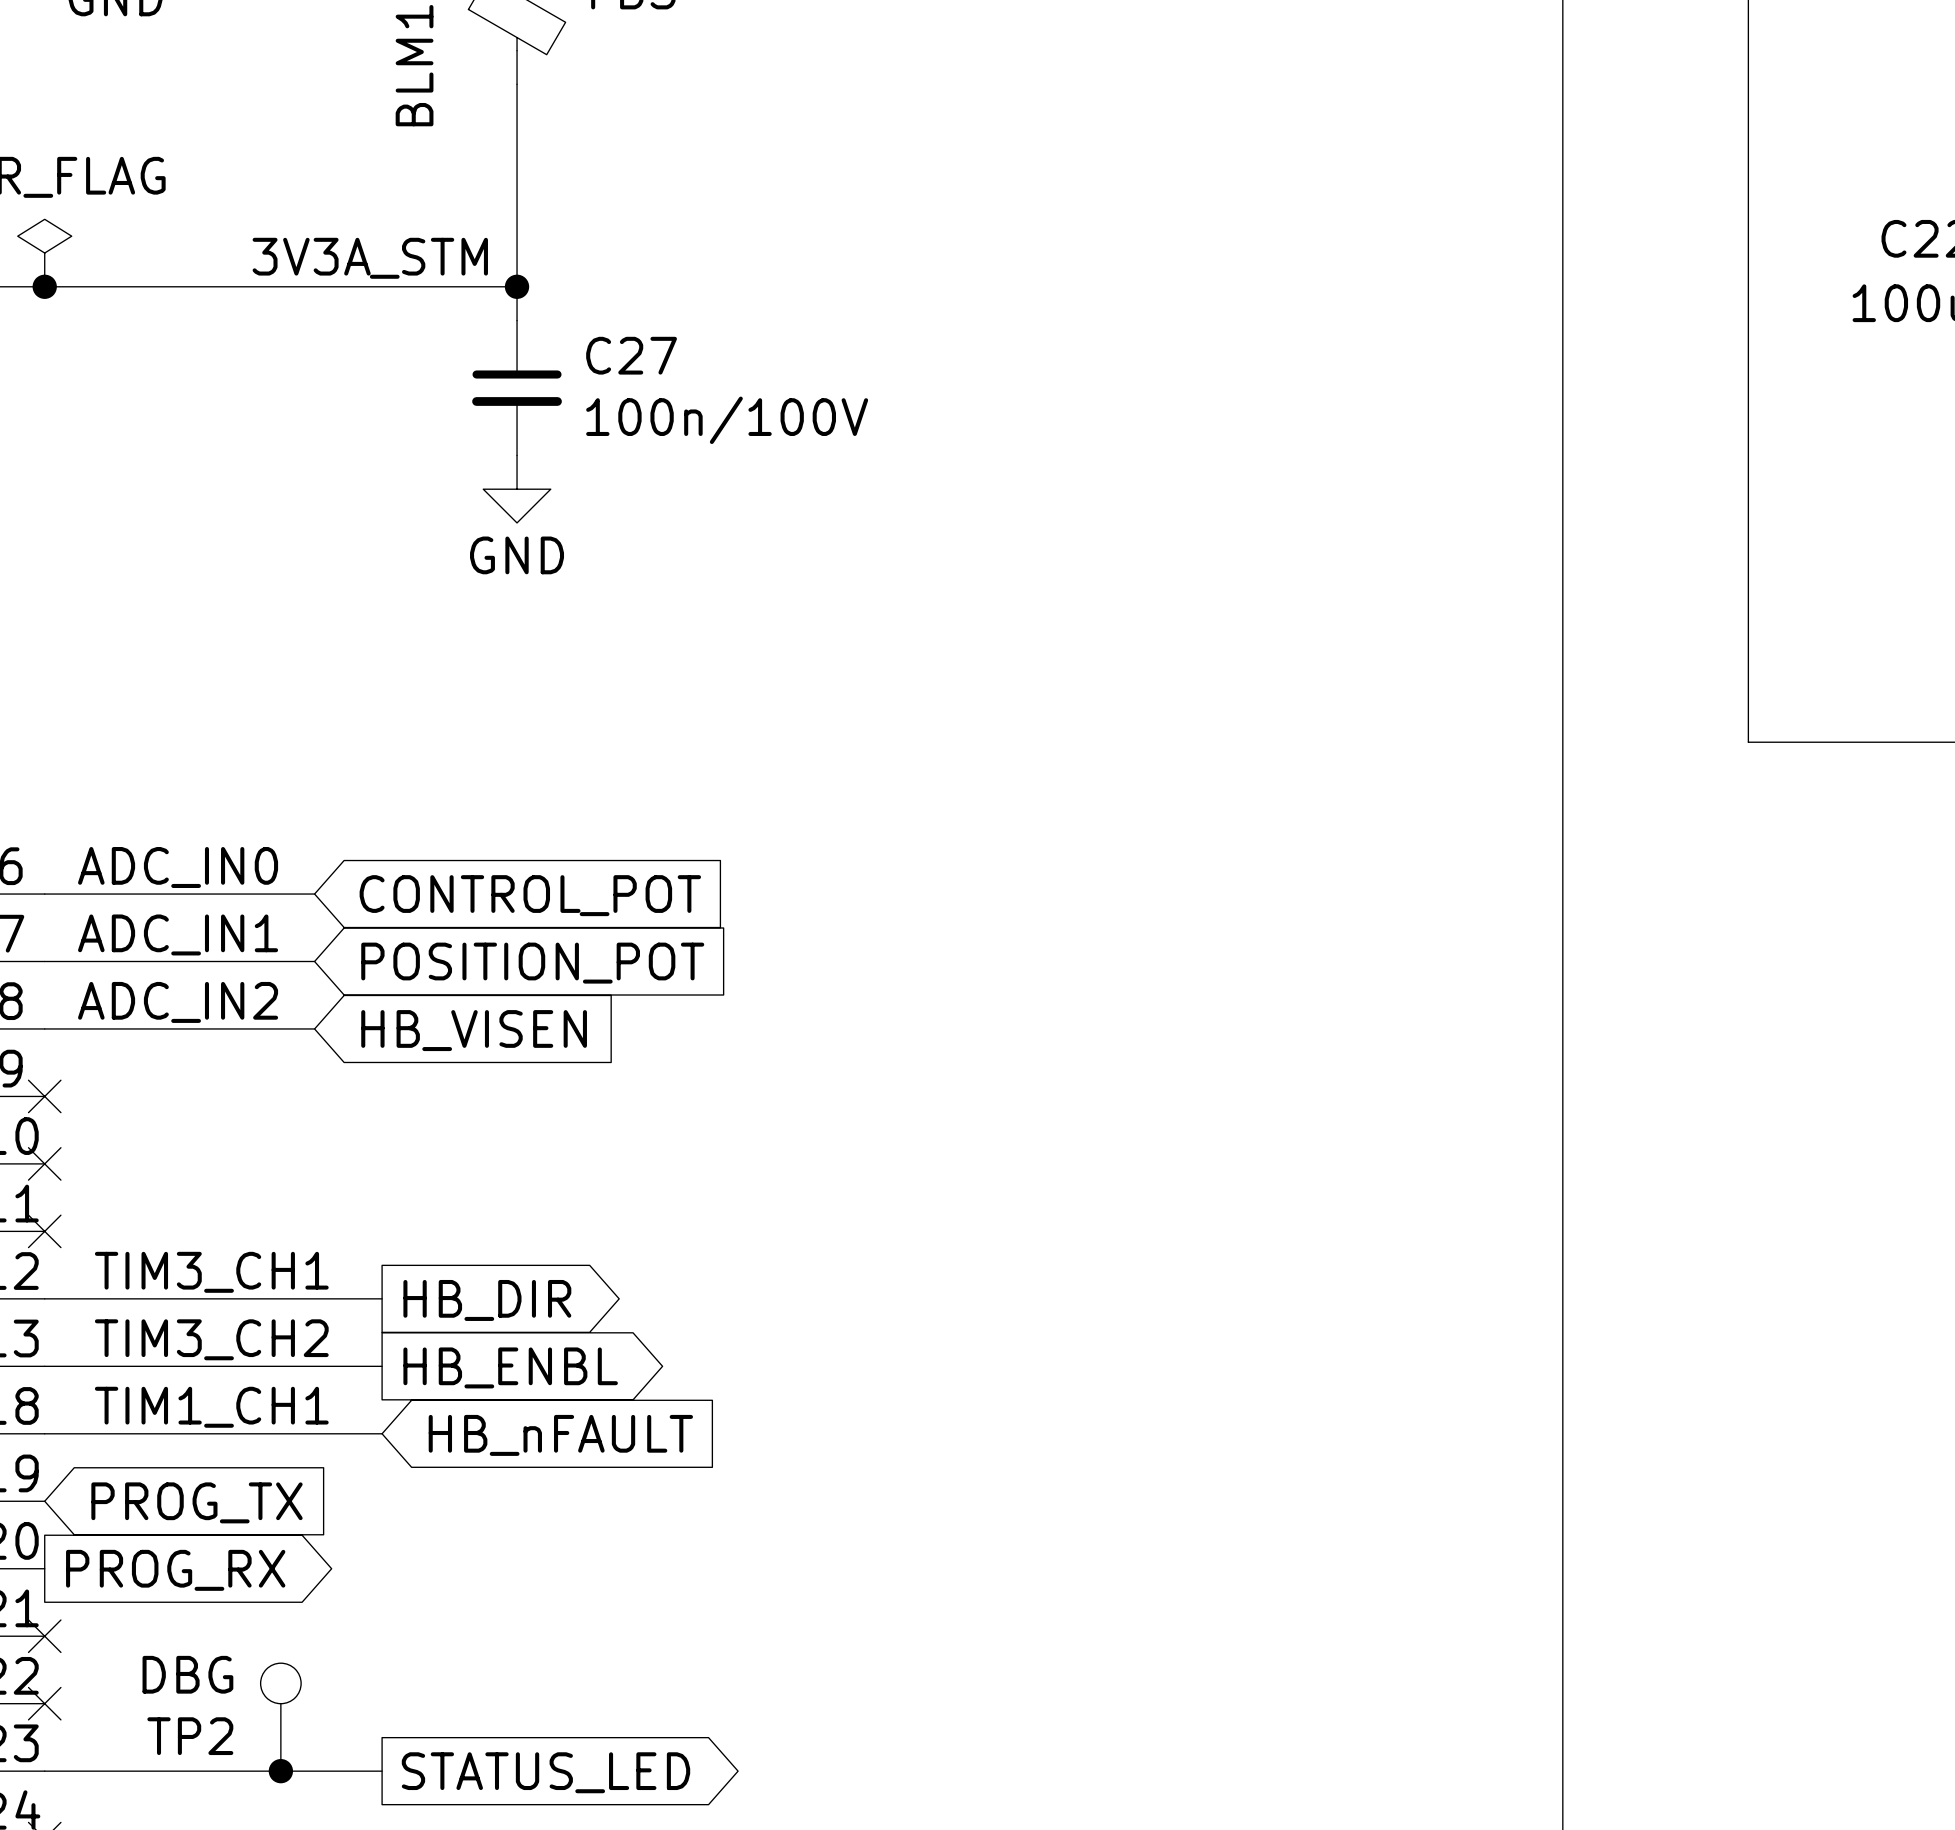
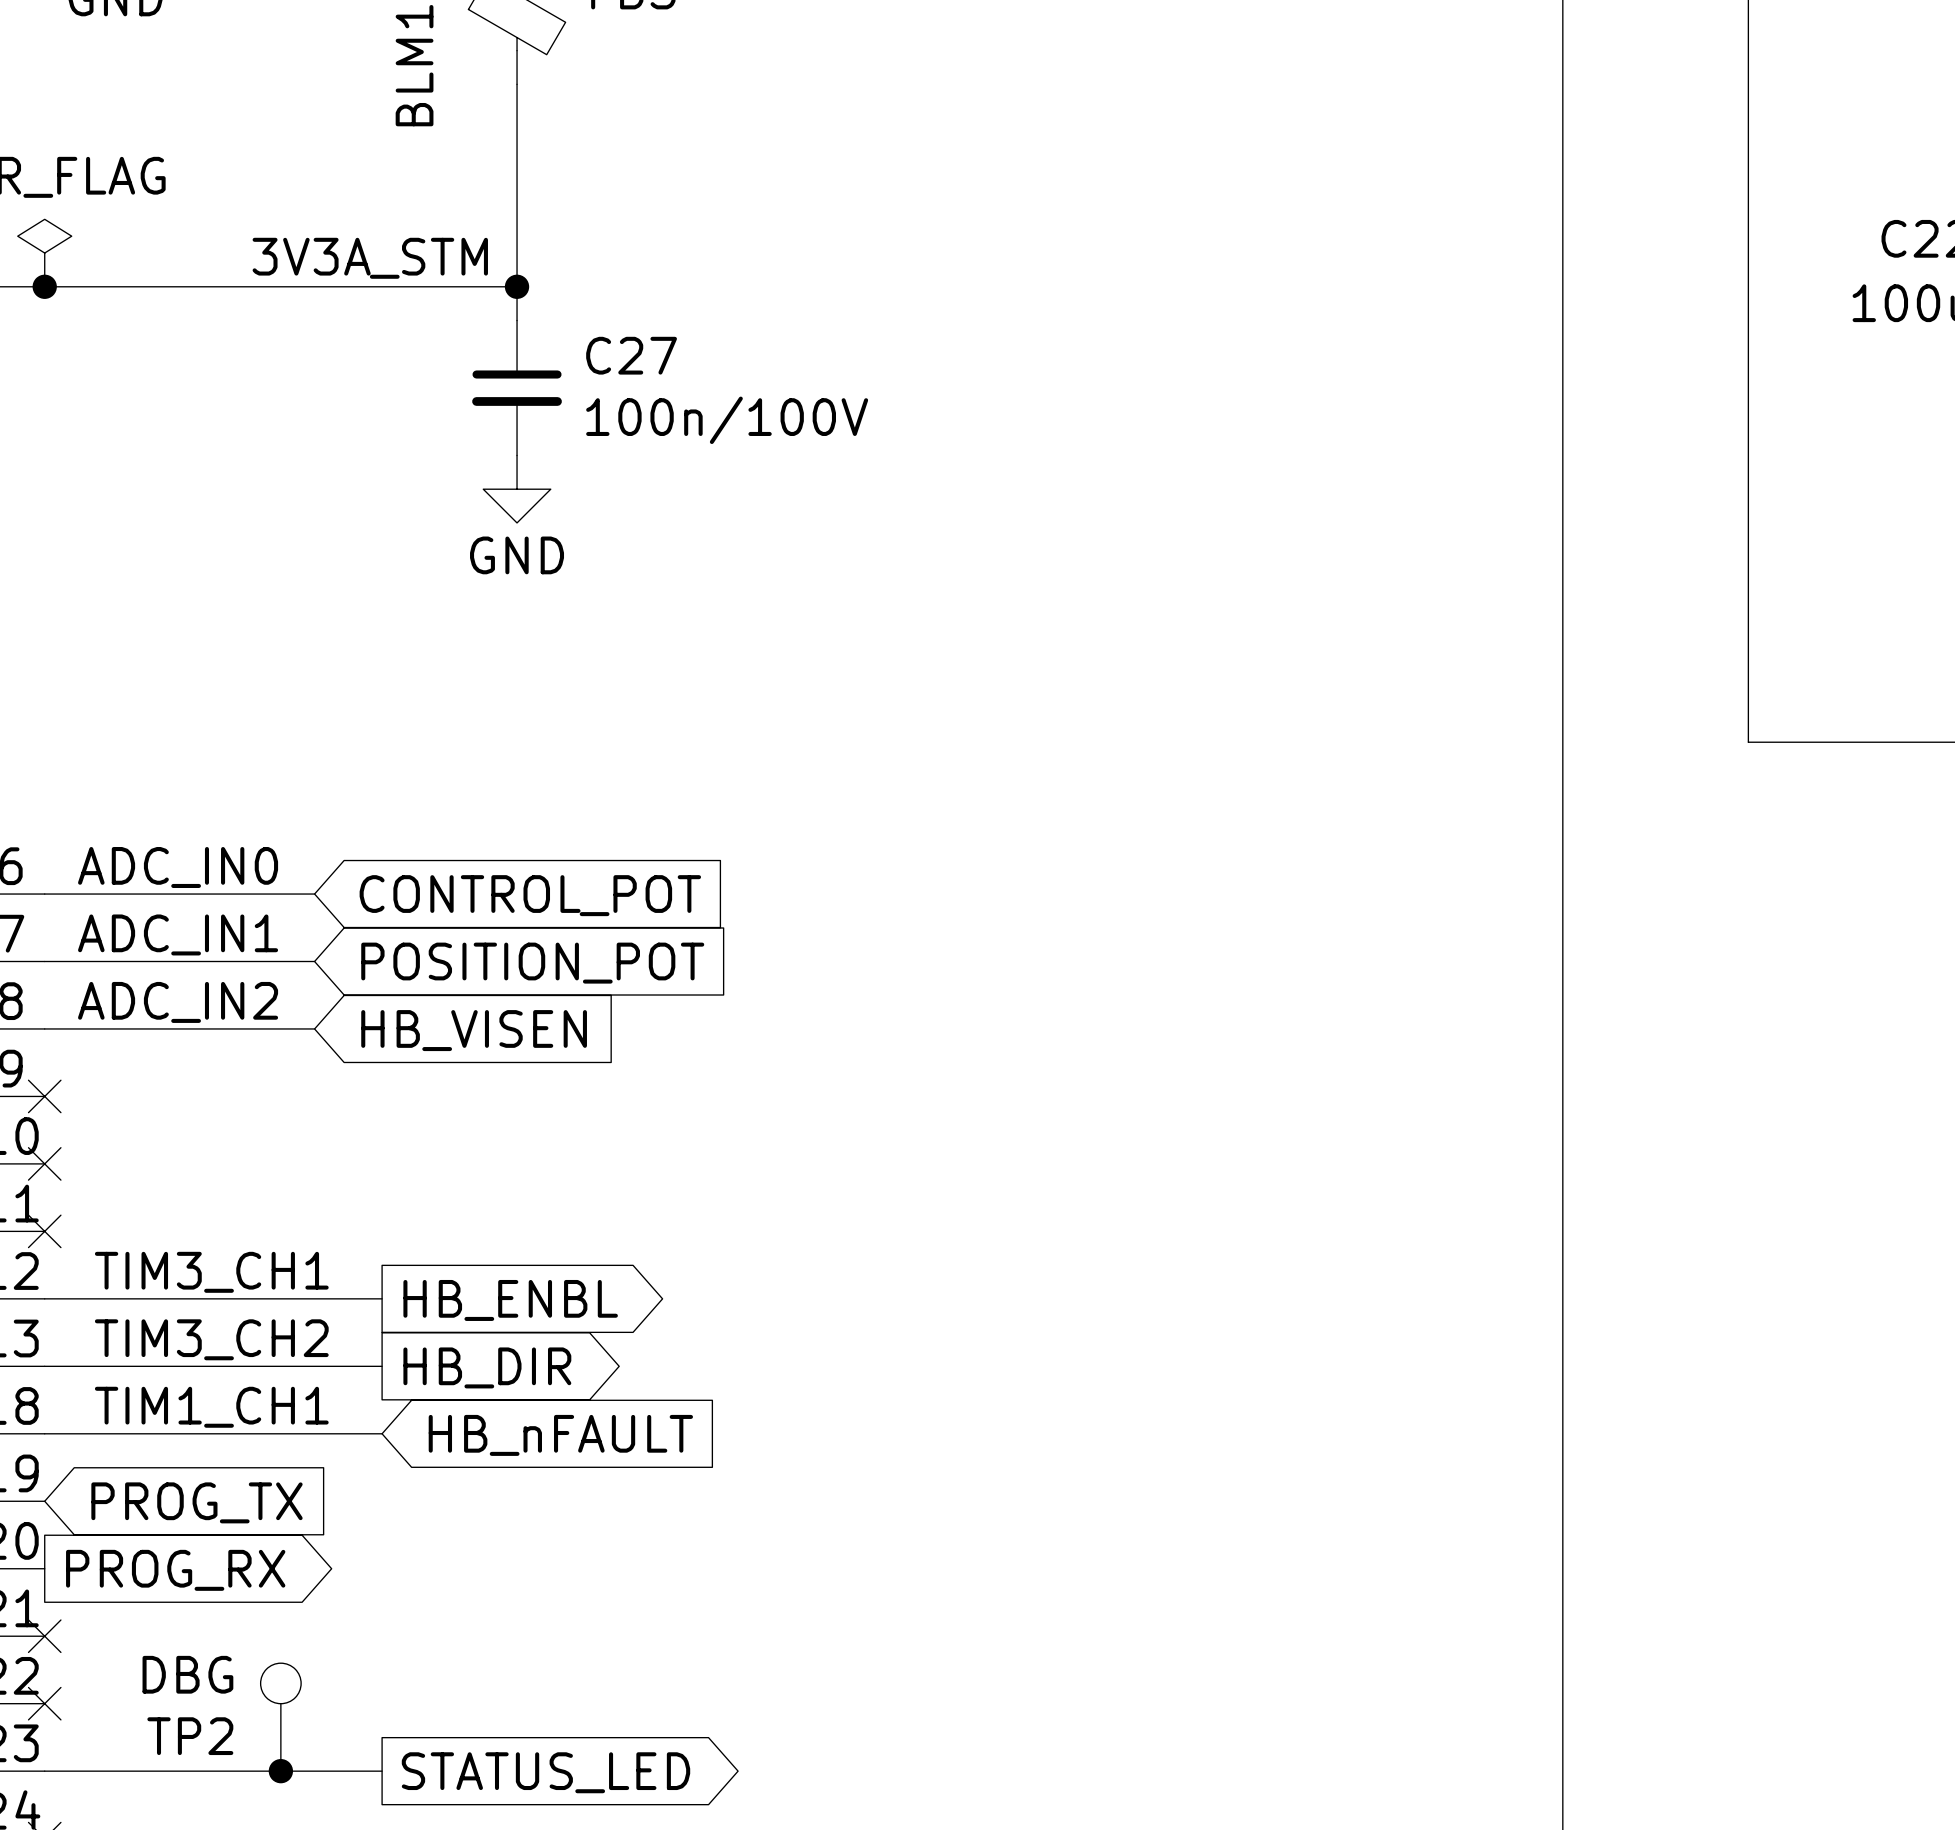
global label: HB_DIR (487, 1300) -> HB_ENBL (510, 1300)
global label: HB_ENBL (510, 1367) -> HB_DIR (487, 1367)

